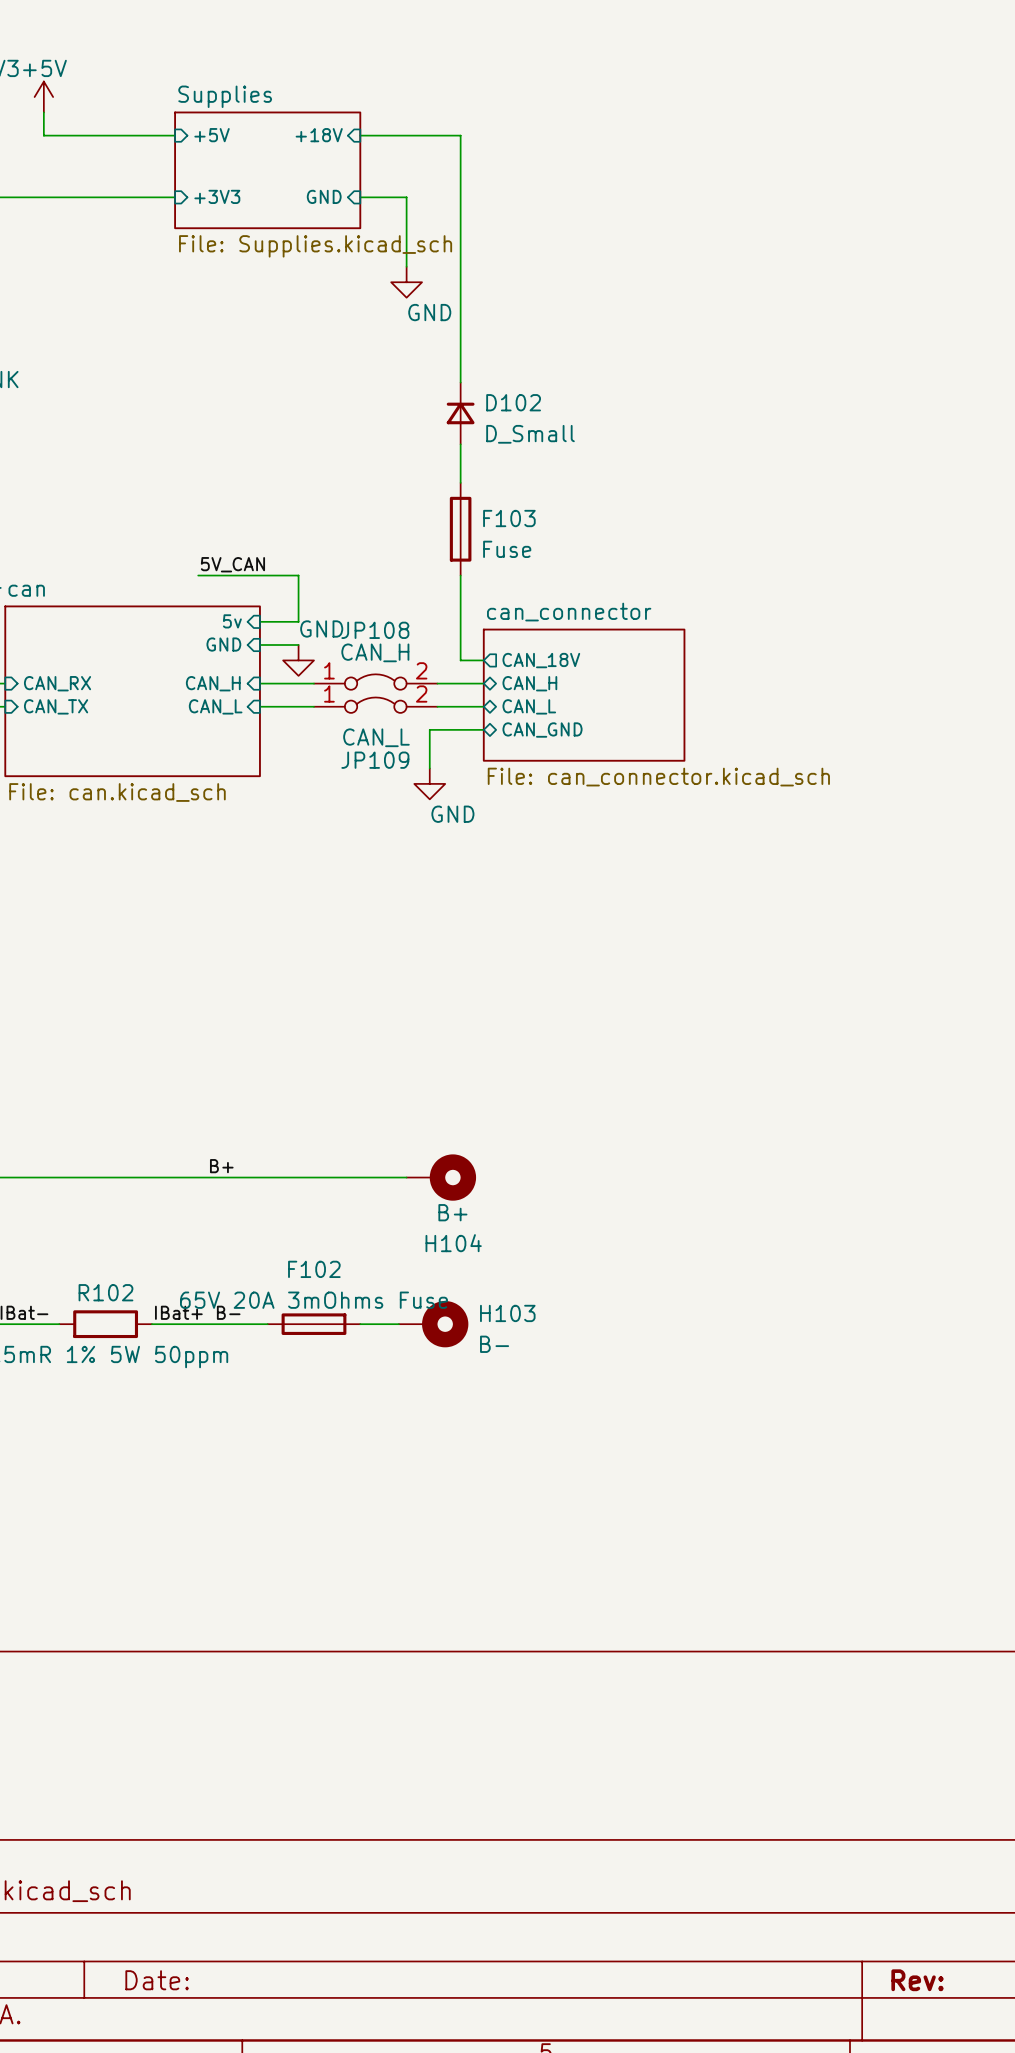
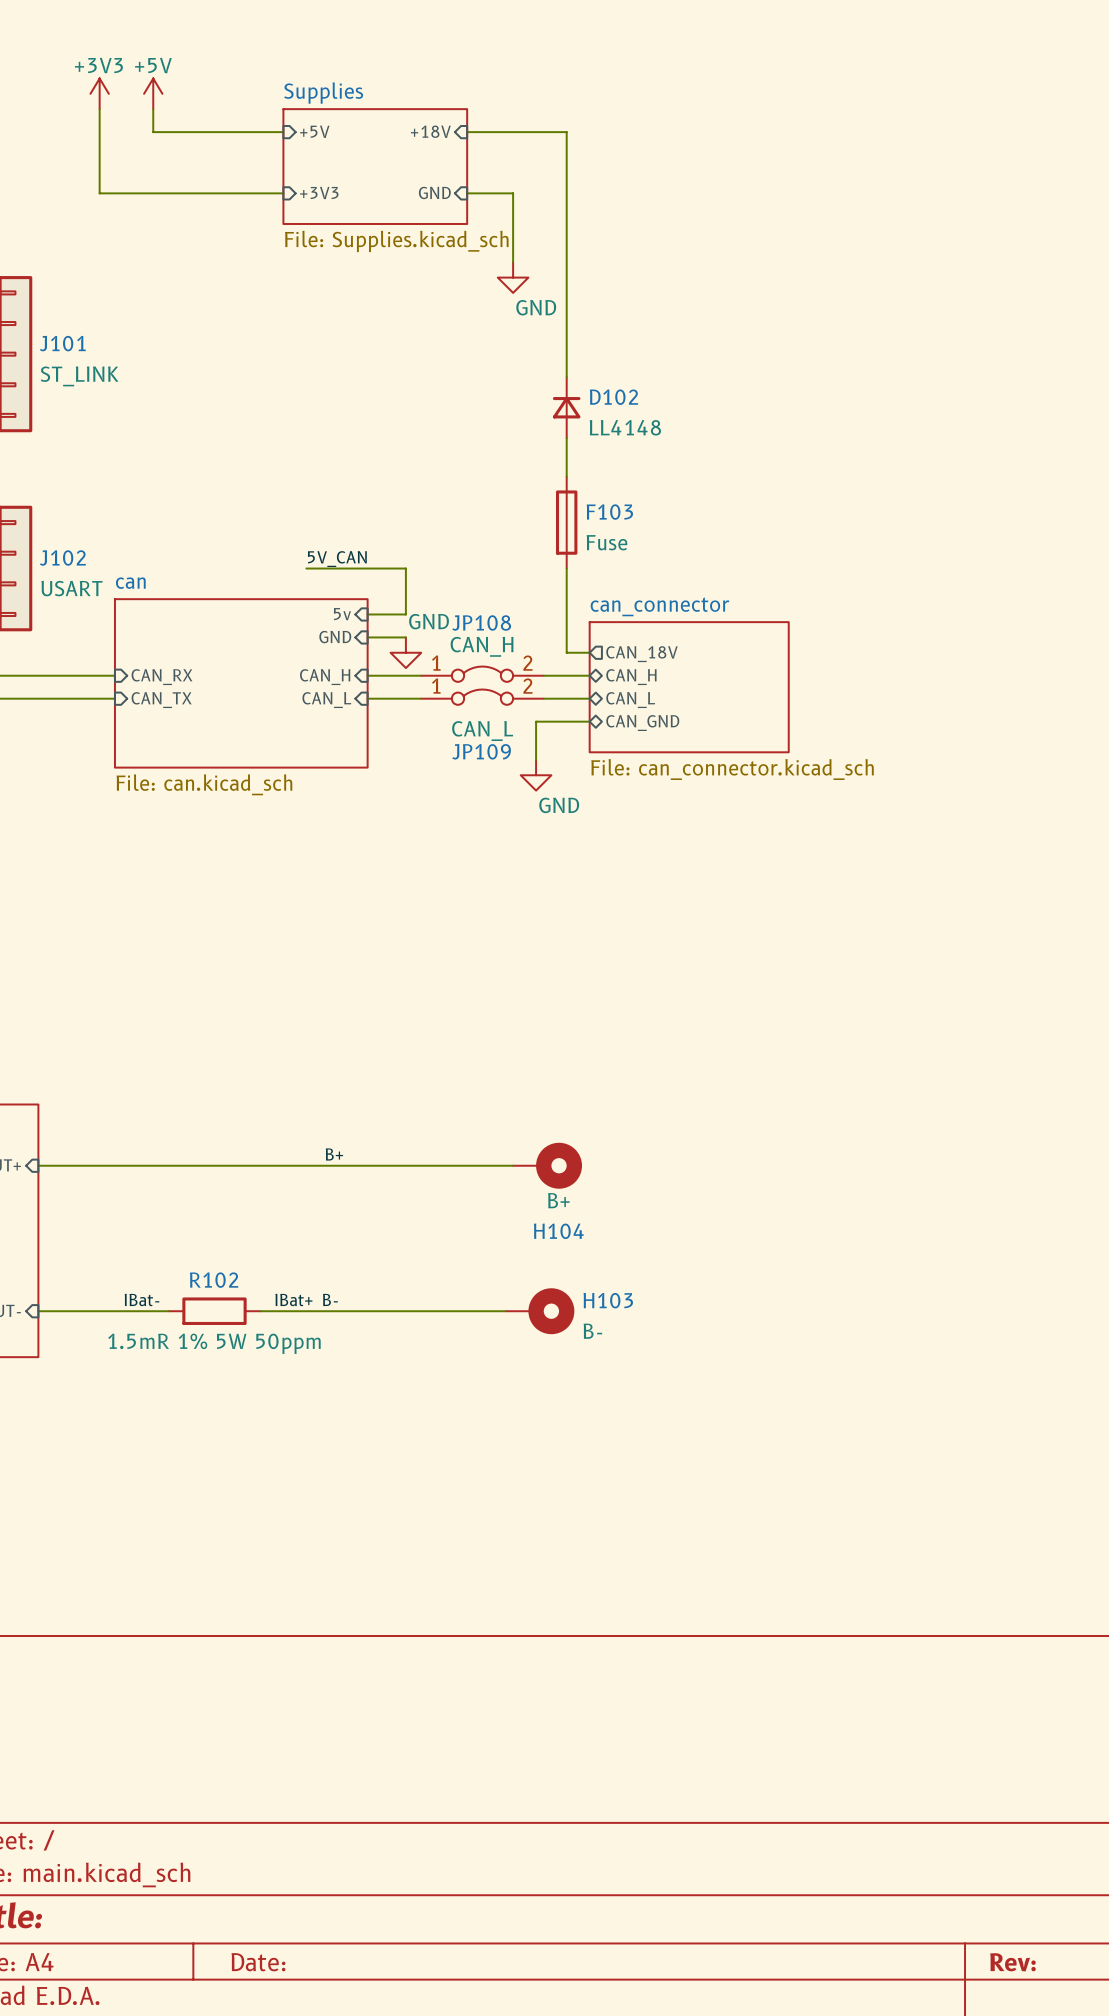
D102 value: D_Small (530, 434) -> LL4148 (625, 427)
F102: 65V 20A 3mOhms Fuse (313, 1324) -> none

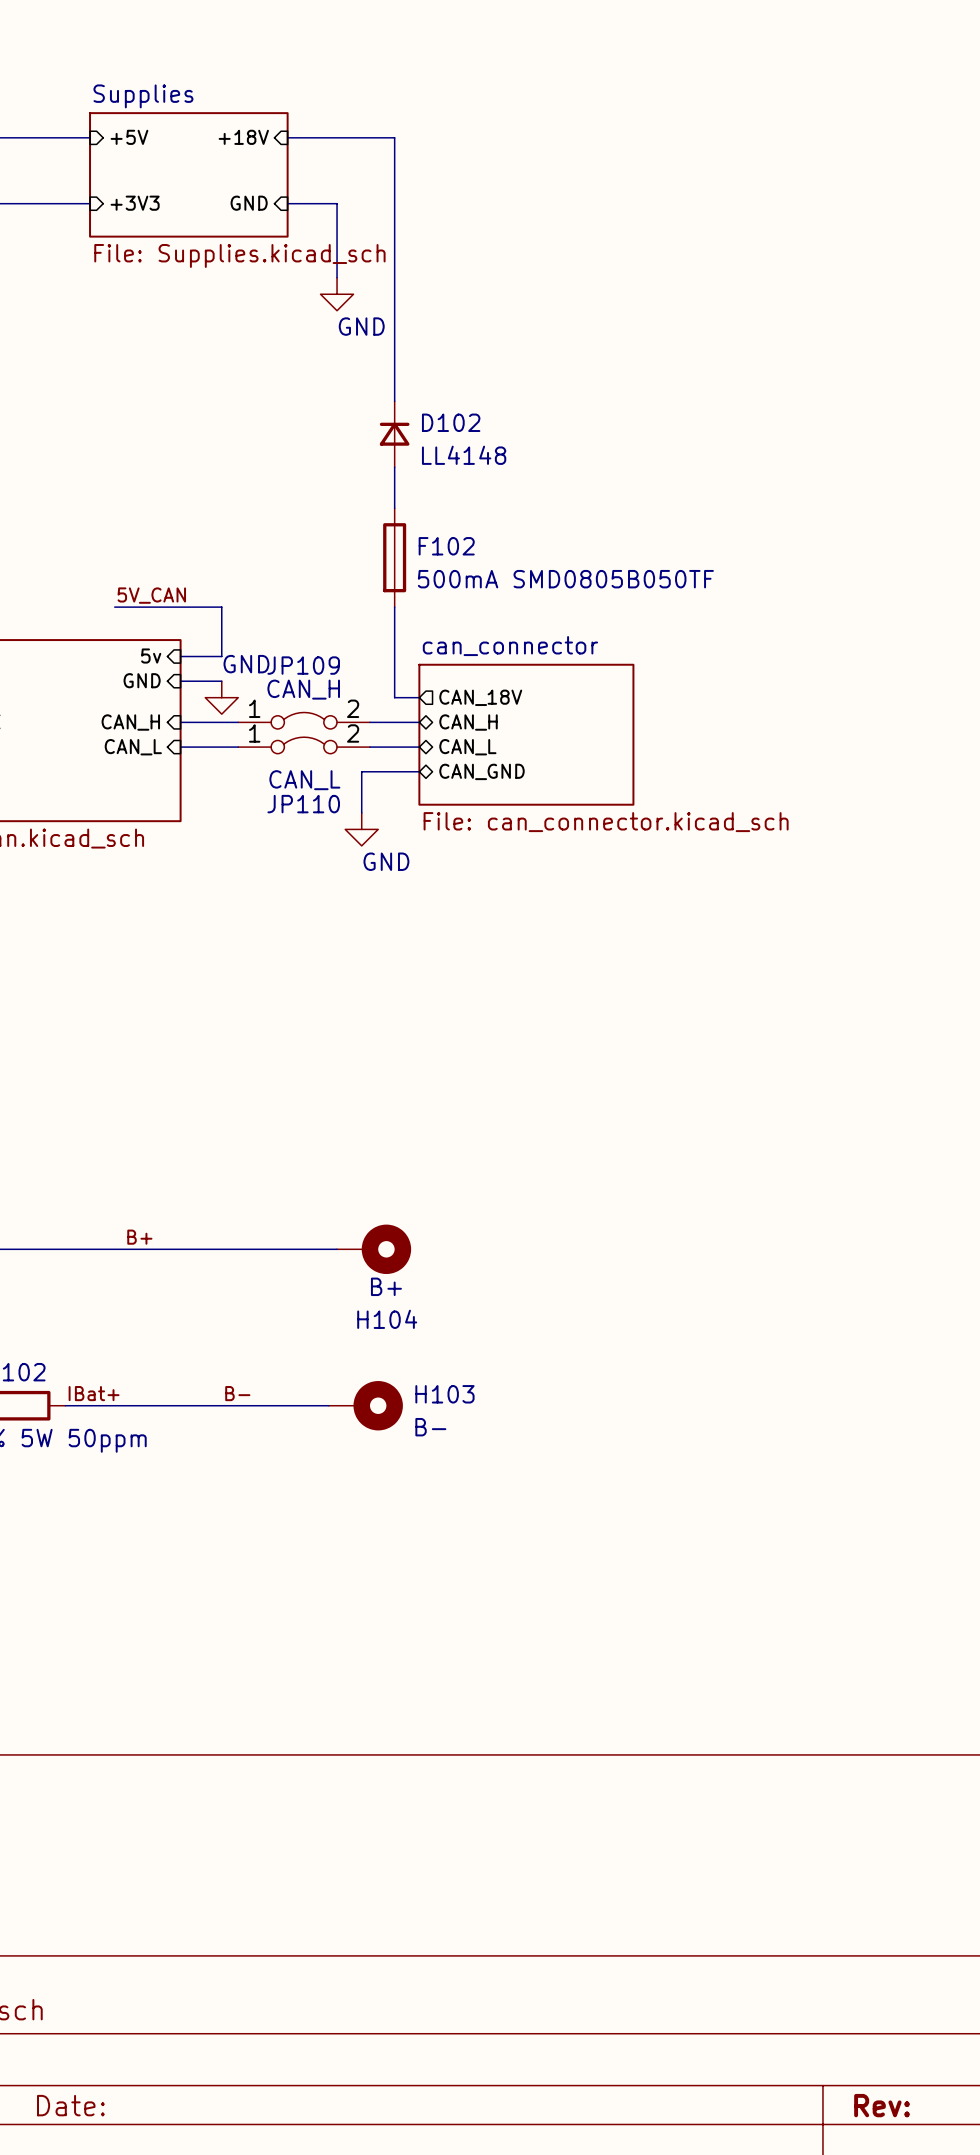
F103 name: F103 (609, 512) -> F102 (446, 546)
F103 value: Fuse (606, 542) -> 500mA SMD0805B050TF (565, 579)
JP108 name: JP108 (481, 622) -> JP109 (303, 665)
JP109 name: JP109 (481, 751) -> JP110 (303, 804)
label position: B- (330, 1299) -> B- (237, 1393)

